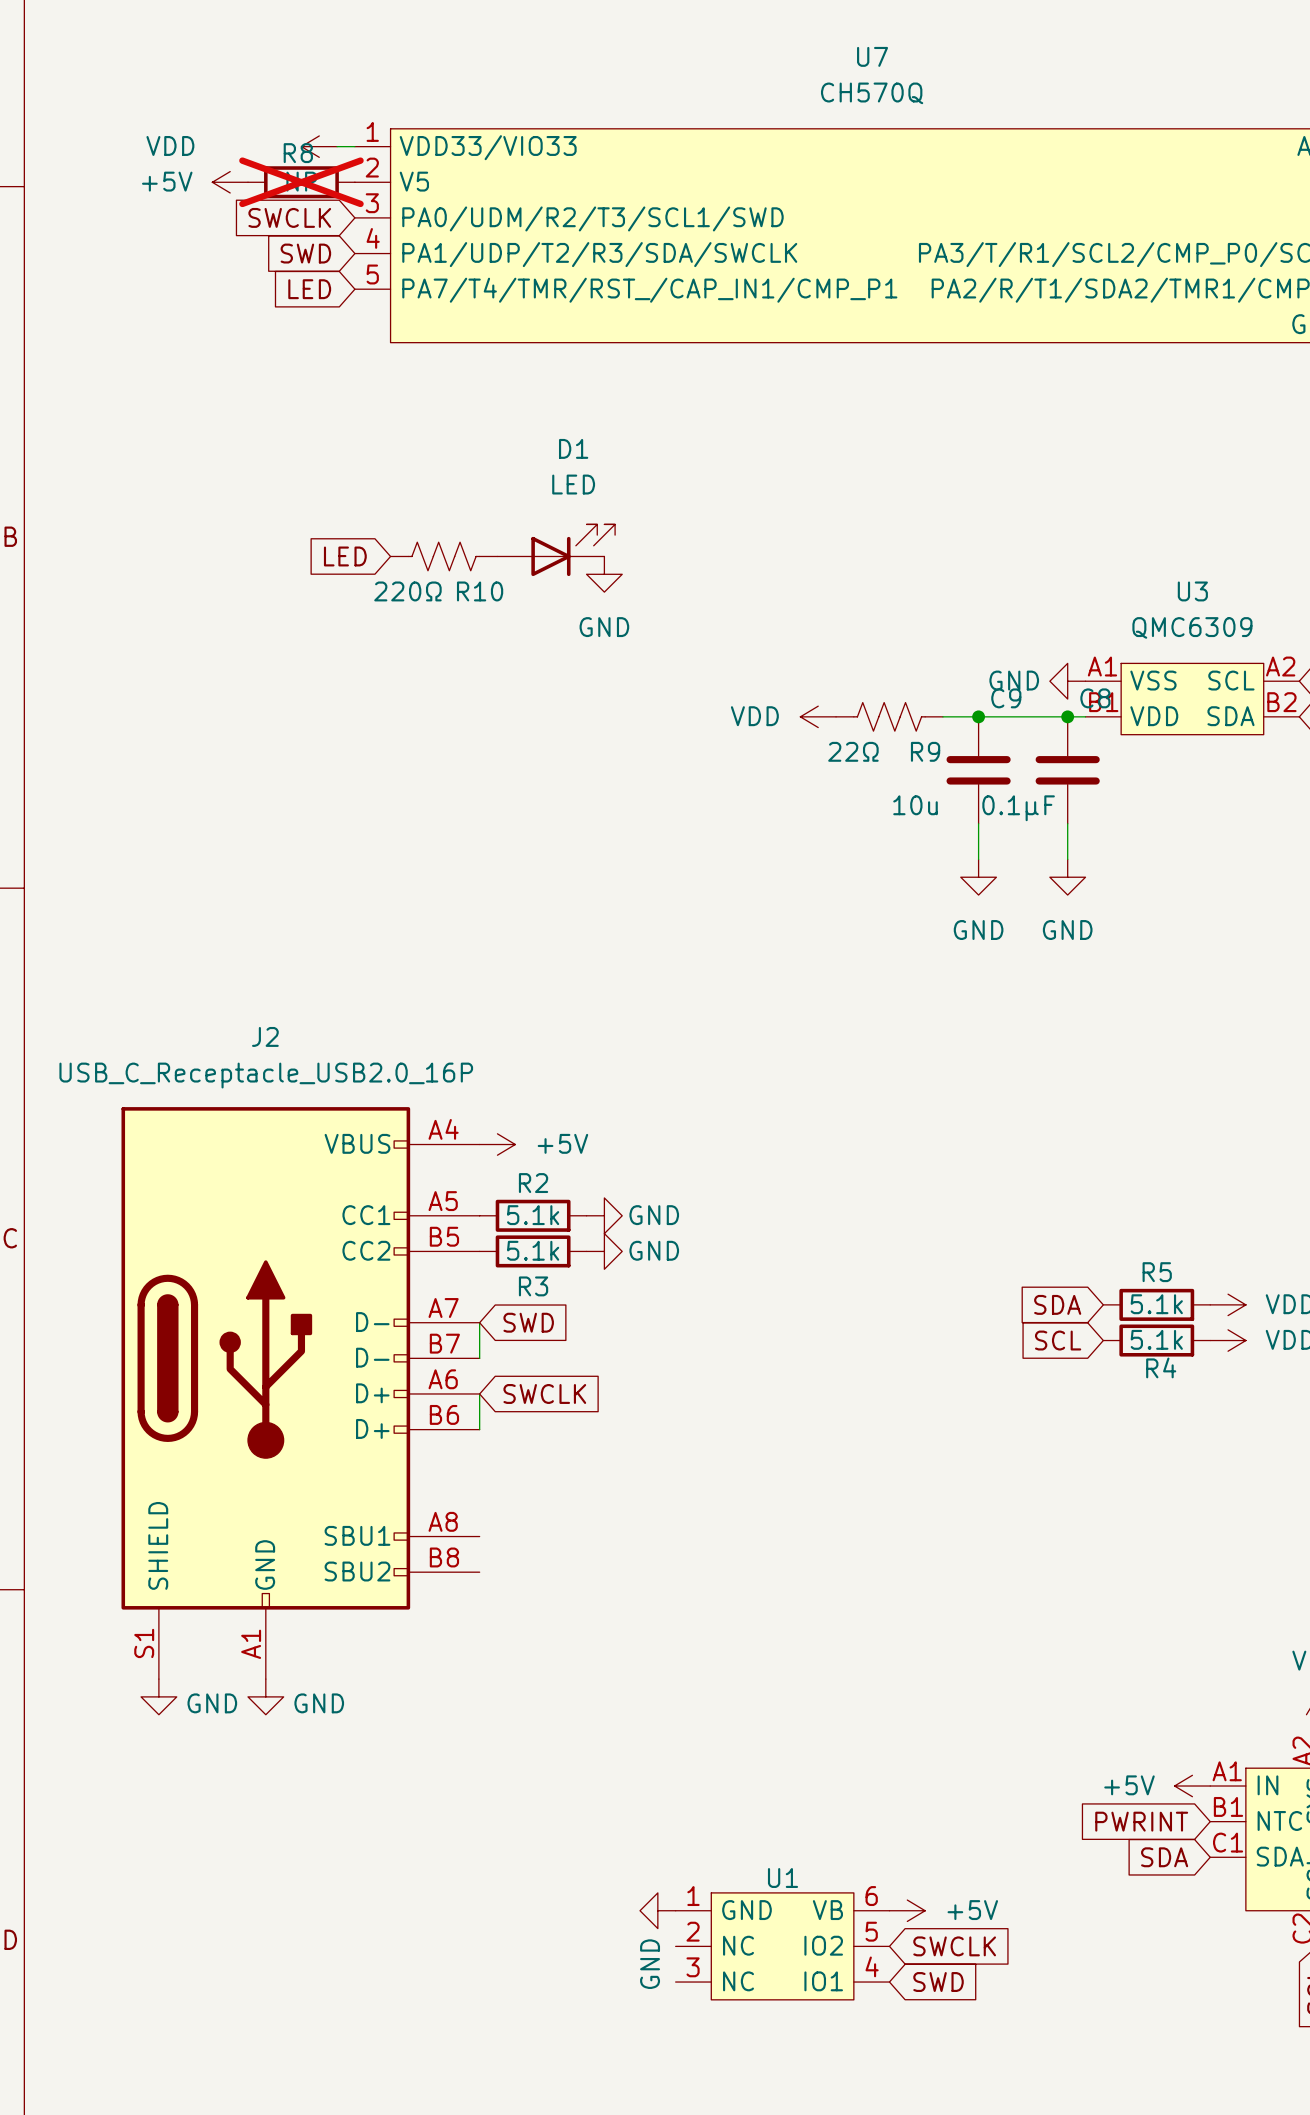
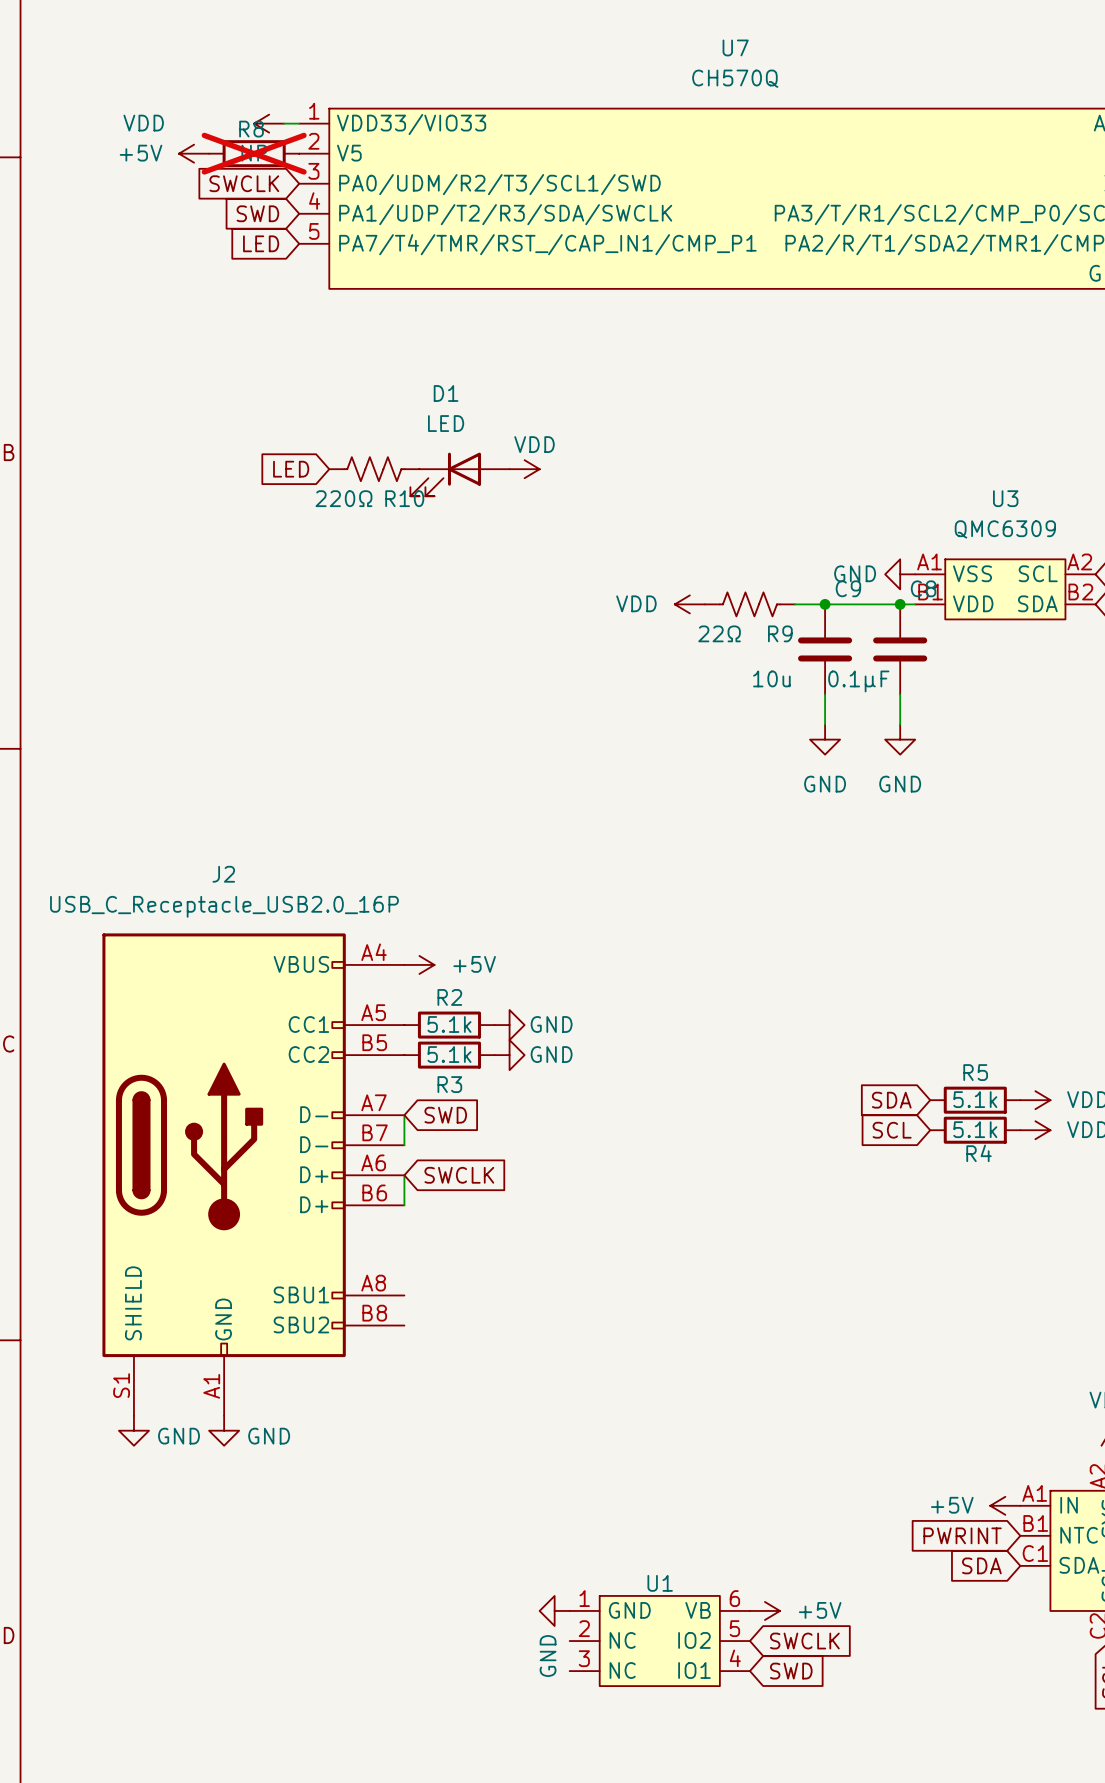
D1 name position: D1 (573, 448) -> D1 (446, 393)
D1 value position: LED (573, 484) -> LED (446, 423)
D1 rotation: 0° (573, 550) -> 180° (445, 474)
power symbol: none -> VDD (524, 469)
power symbol: GND (604, 574) -> none

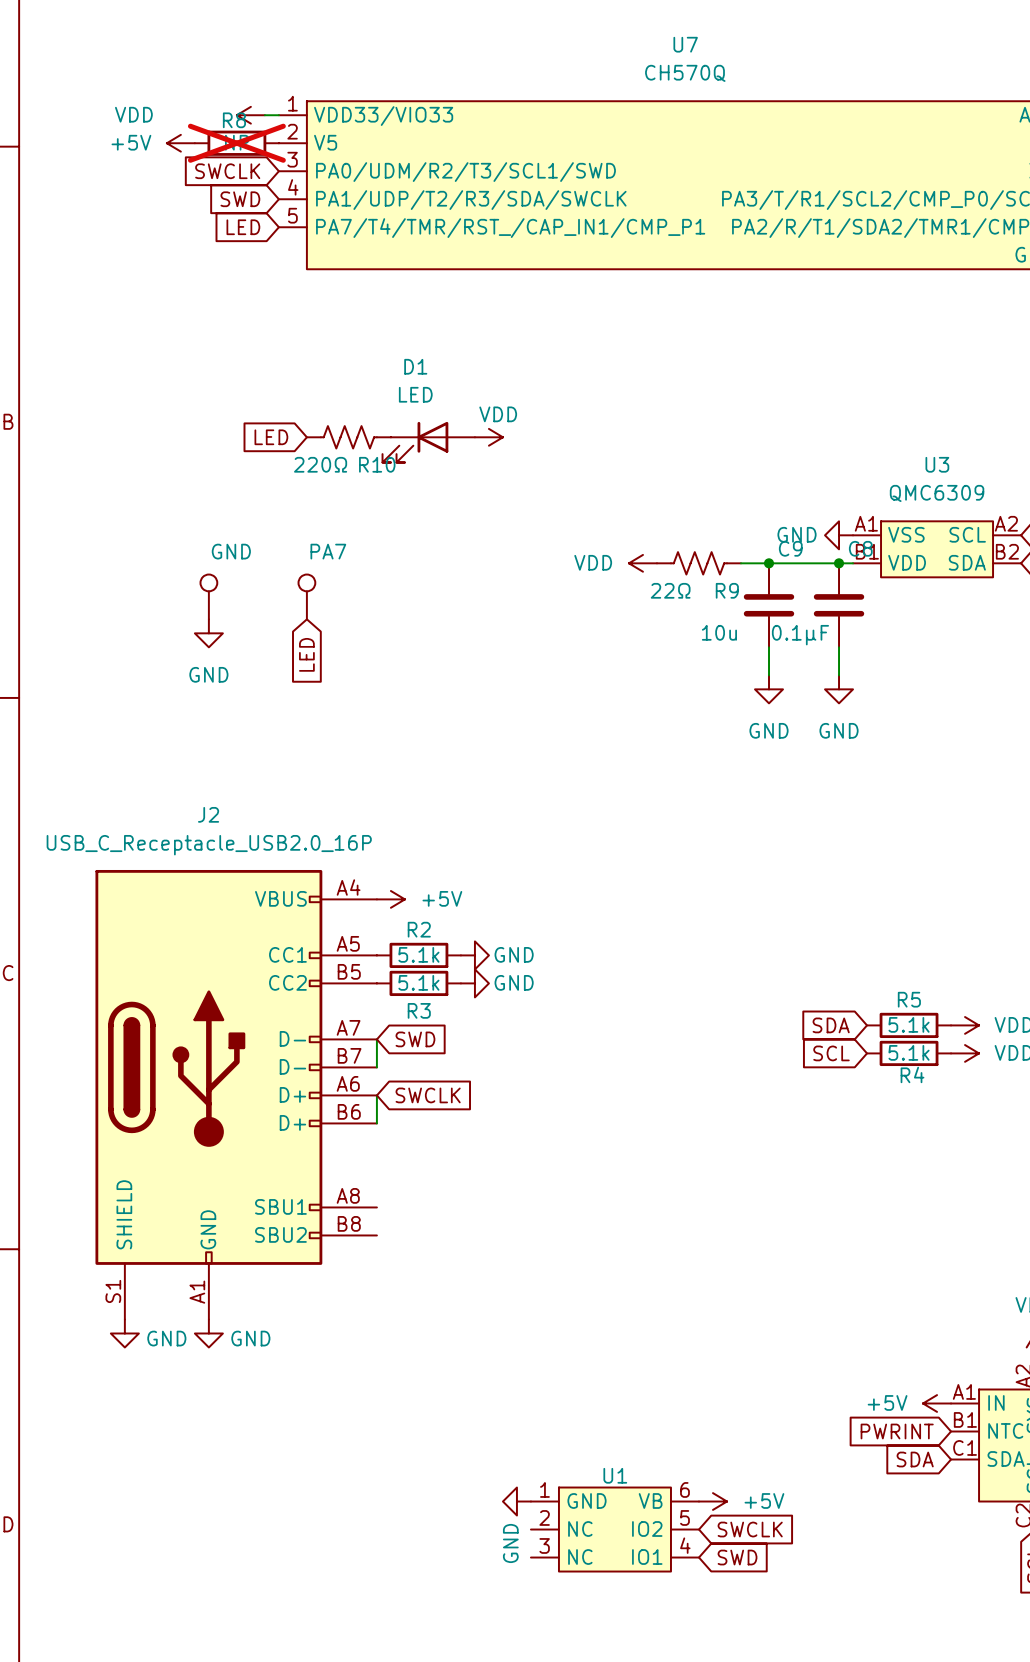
part: none -> GND (208, 596)
part: none -> PA7 (306, 596)
power symbol: none -> GND (208, 633)
global label: none -> LED (306, 654)

